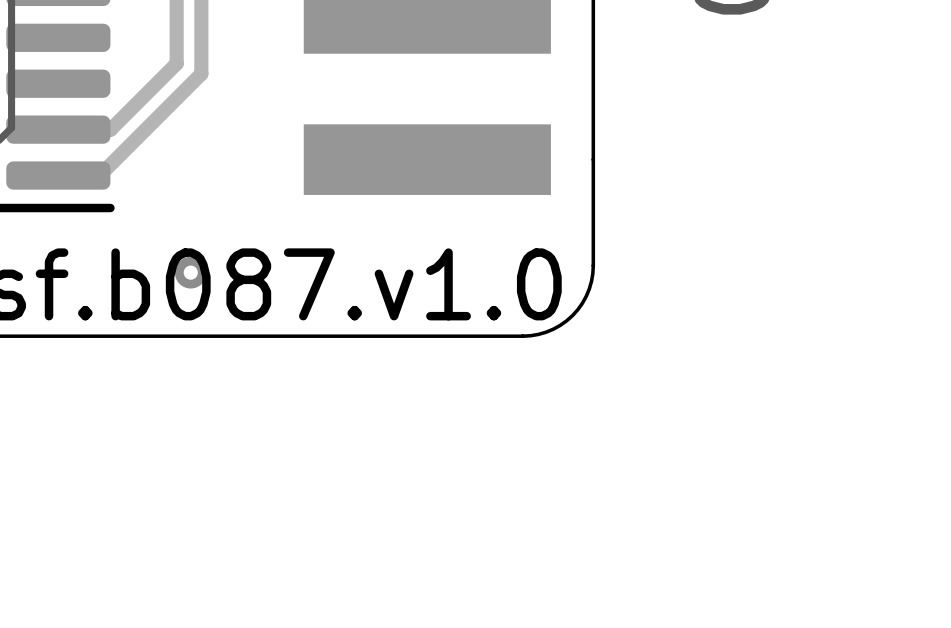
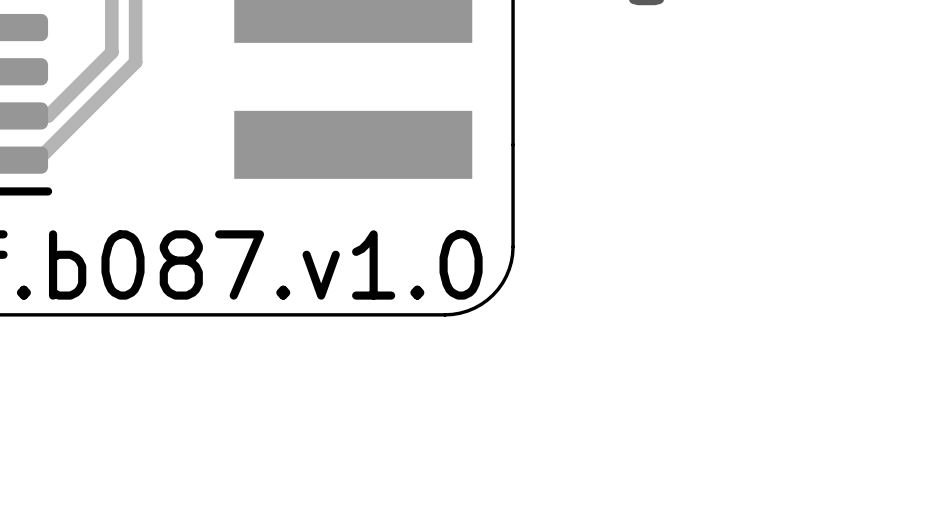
via: (190, 272) -> none

